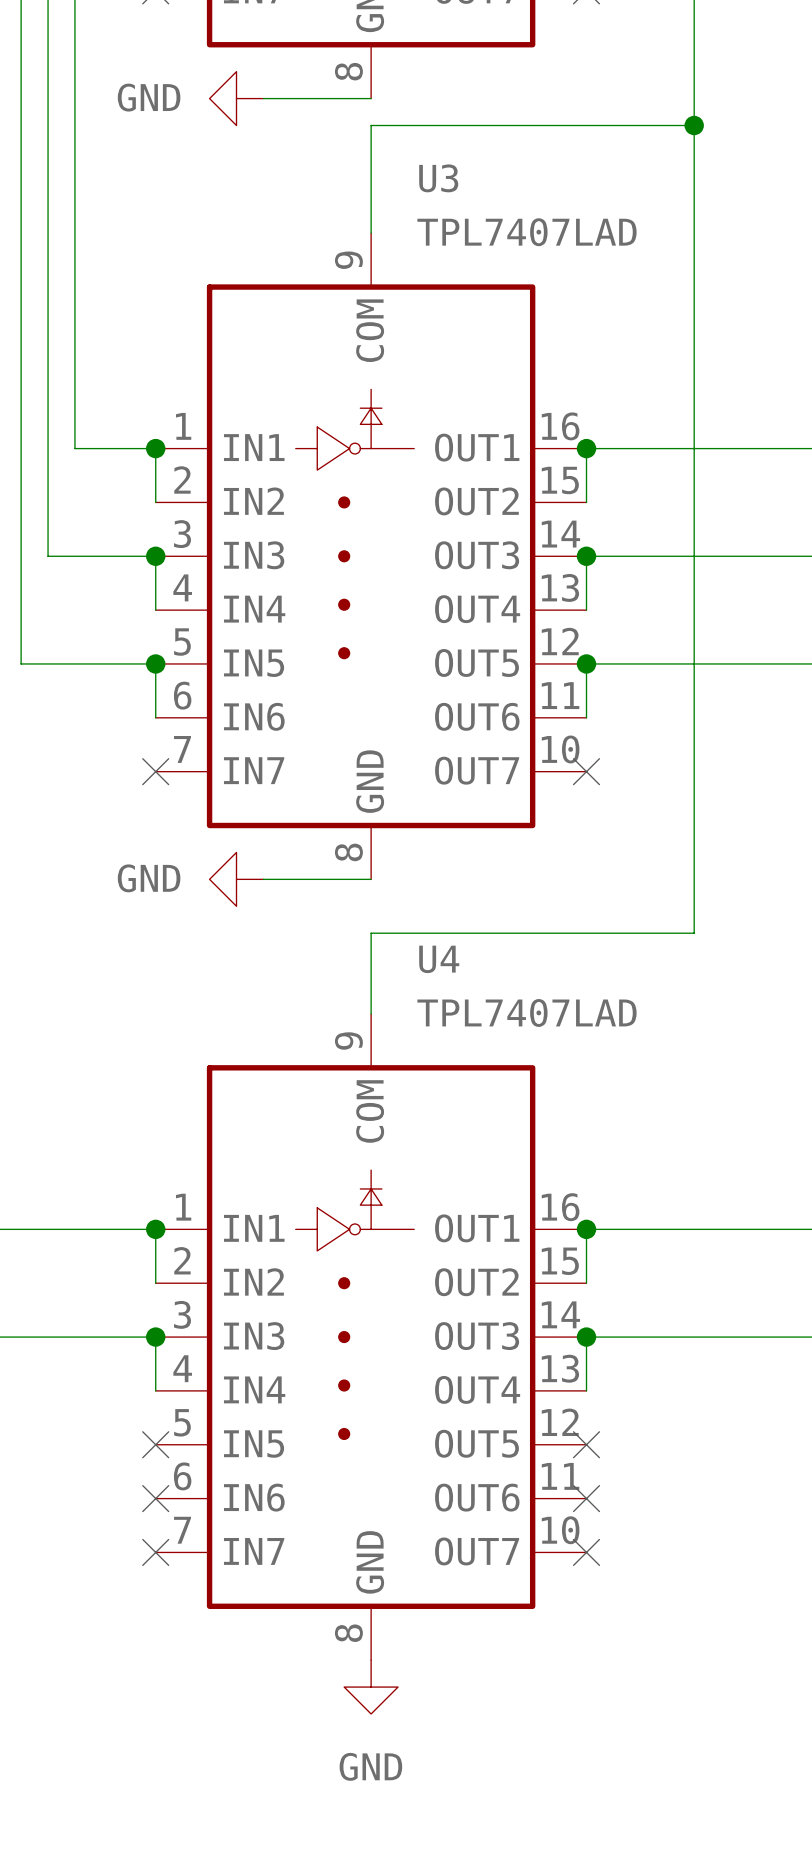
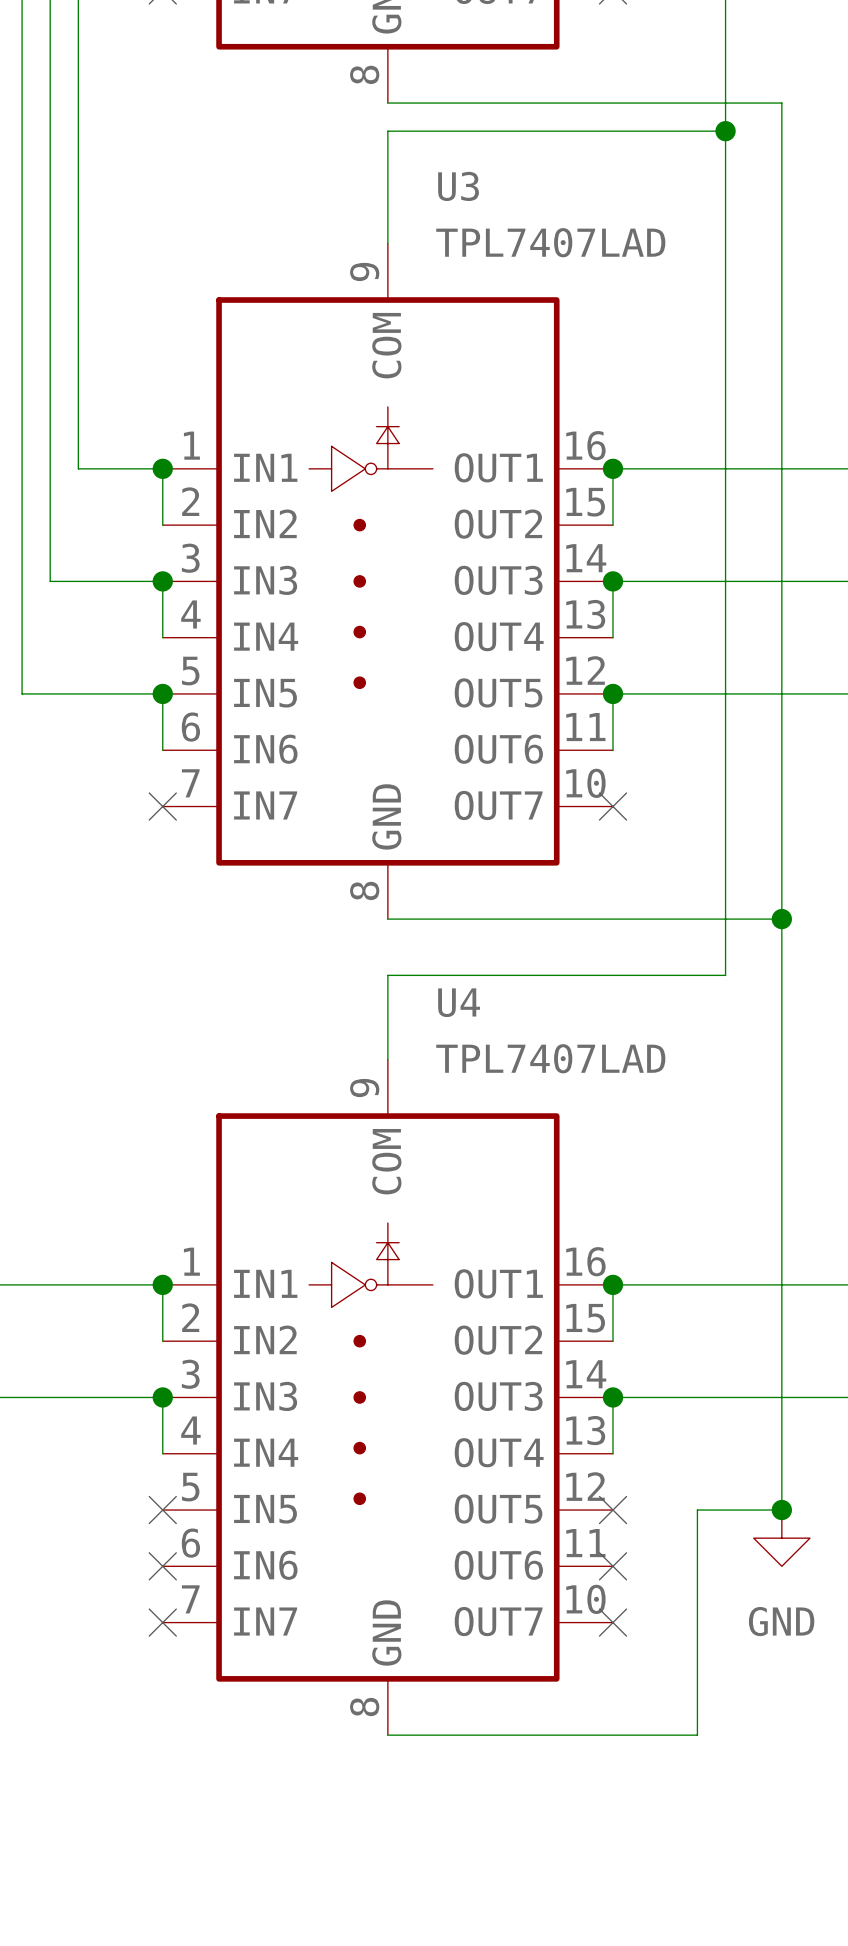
power symbol: GND (236, 98) -> none
wire: (263, 98) (371, 98) -> (387, 1735) (697, 1735) (697, 1510) (781, 1510) (781, 103) (387, 103)
power symbol: GND (236, 879) -> none
wire: (263, 879) (371, 879) -> (781, 919) (387, 919)
junction: none -> (781, 919)
junction: none -> (781, 1510)
power symbol: none -> GND (781, 1538)
power symbol: GND (371, 1687) -> none

